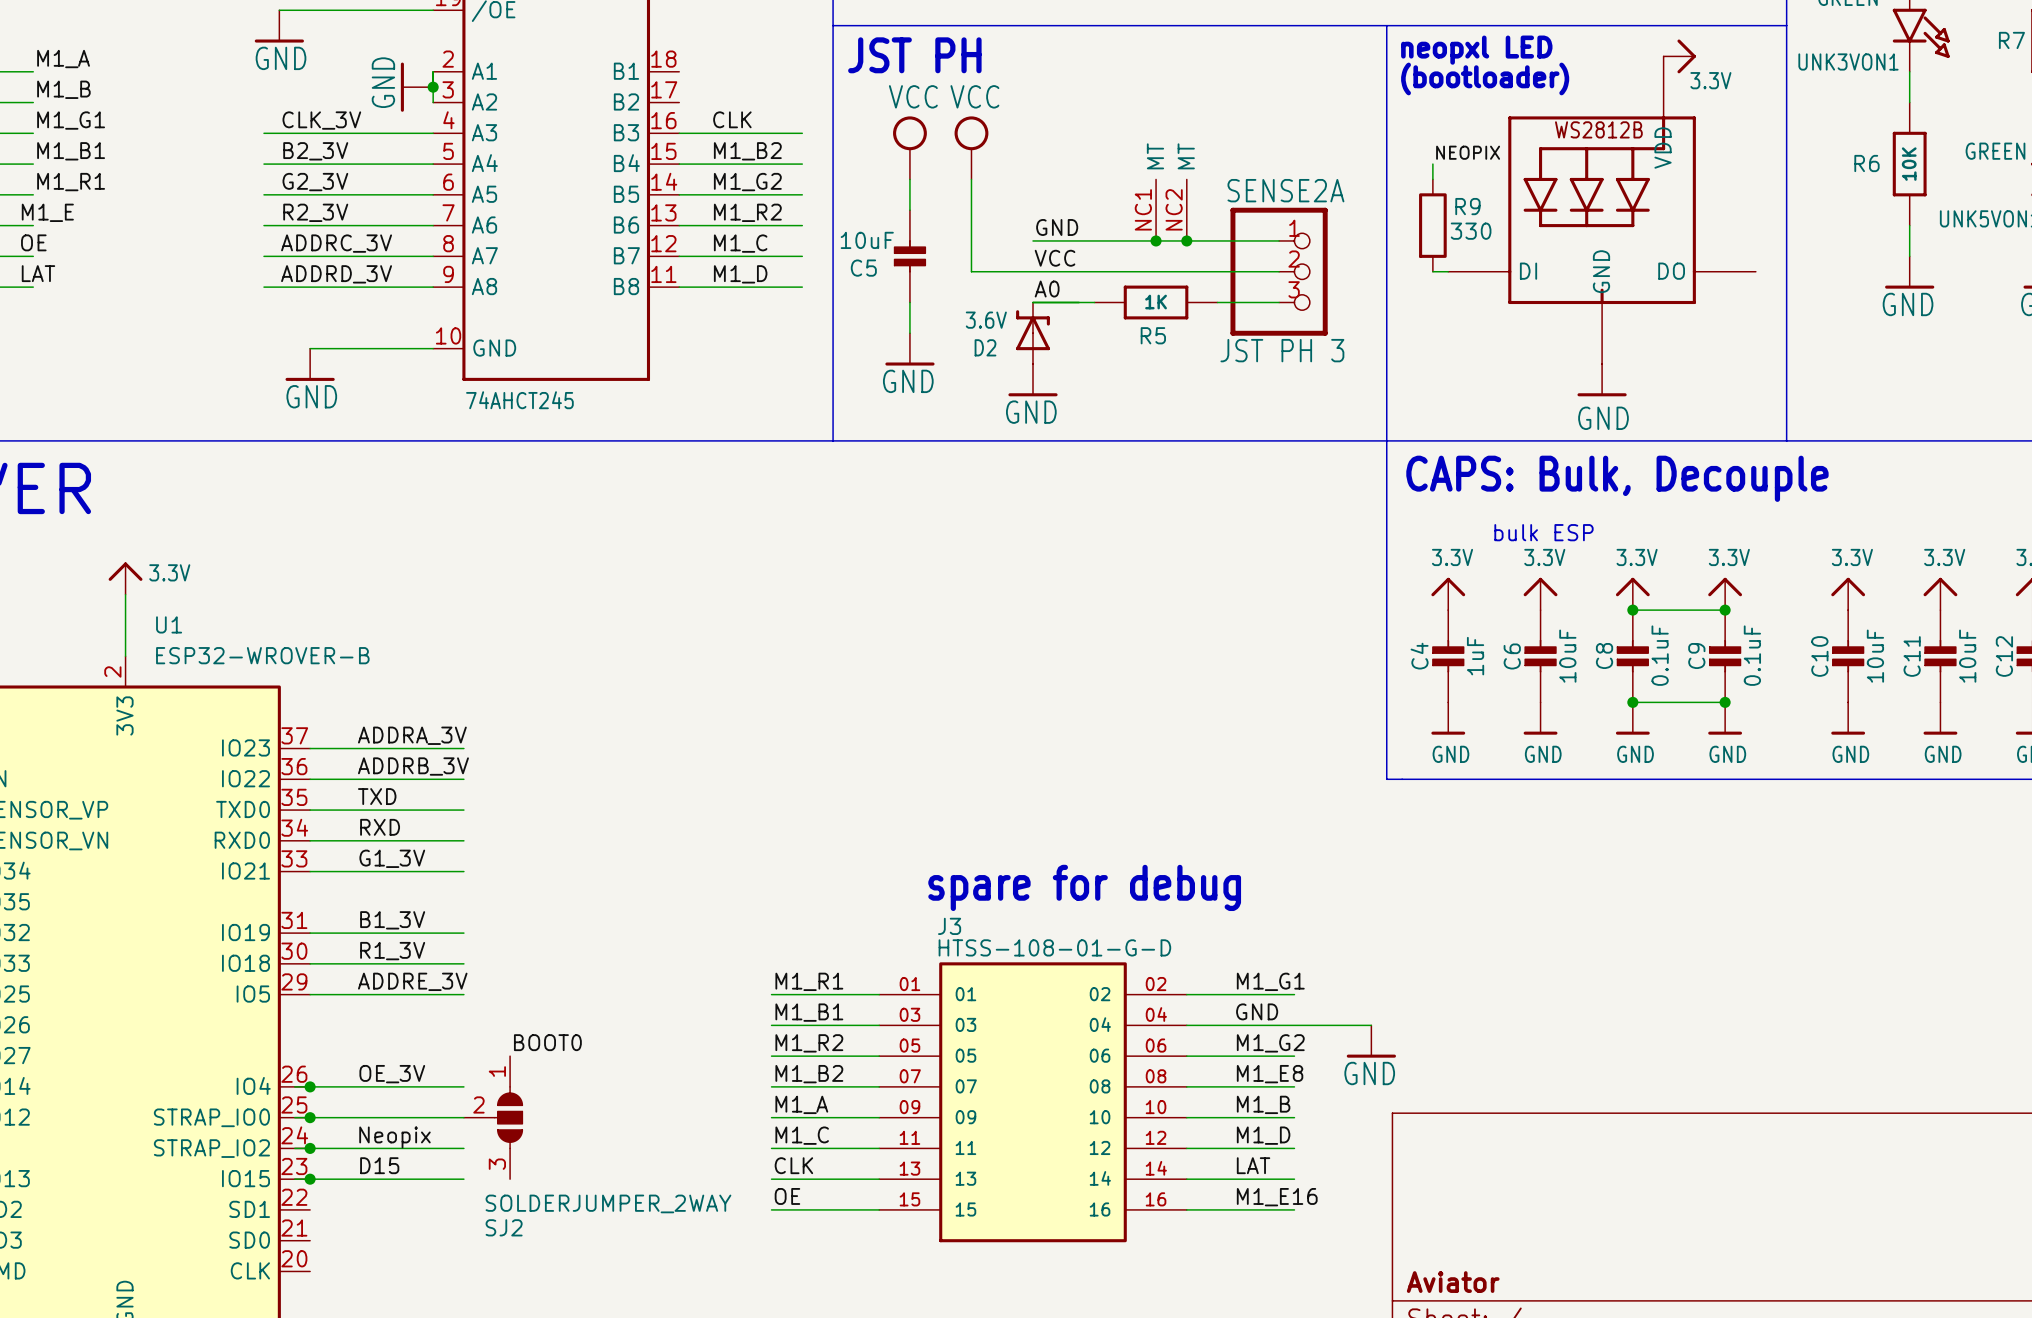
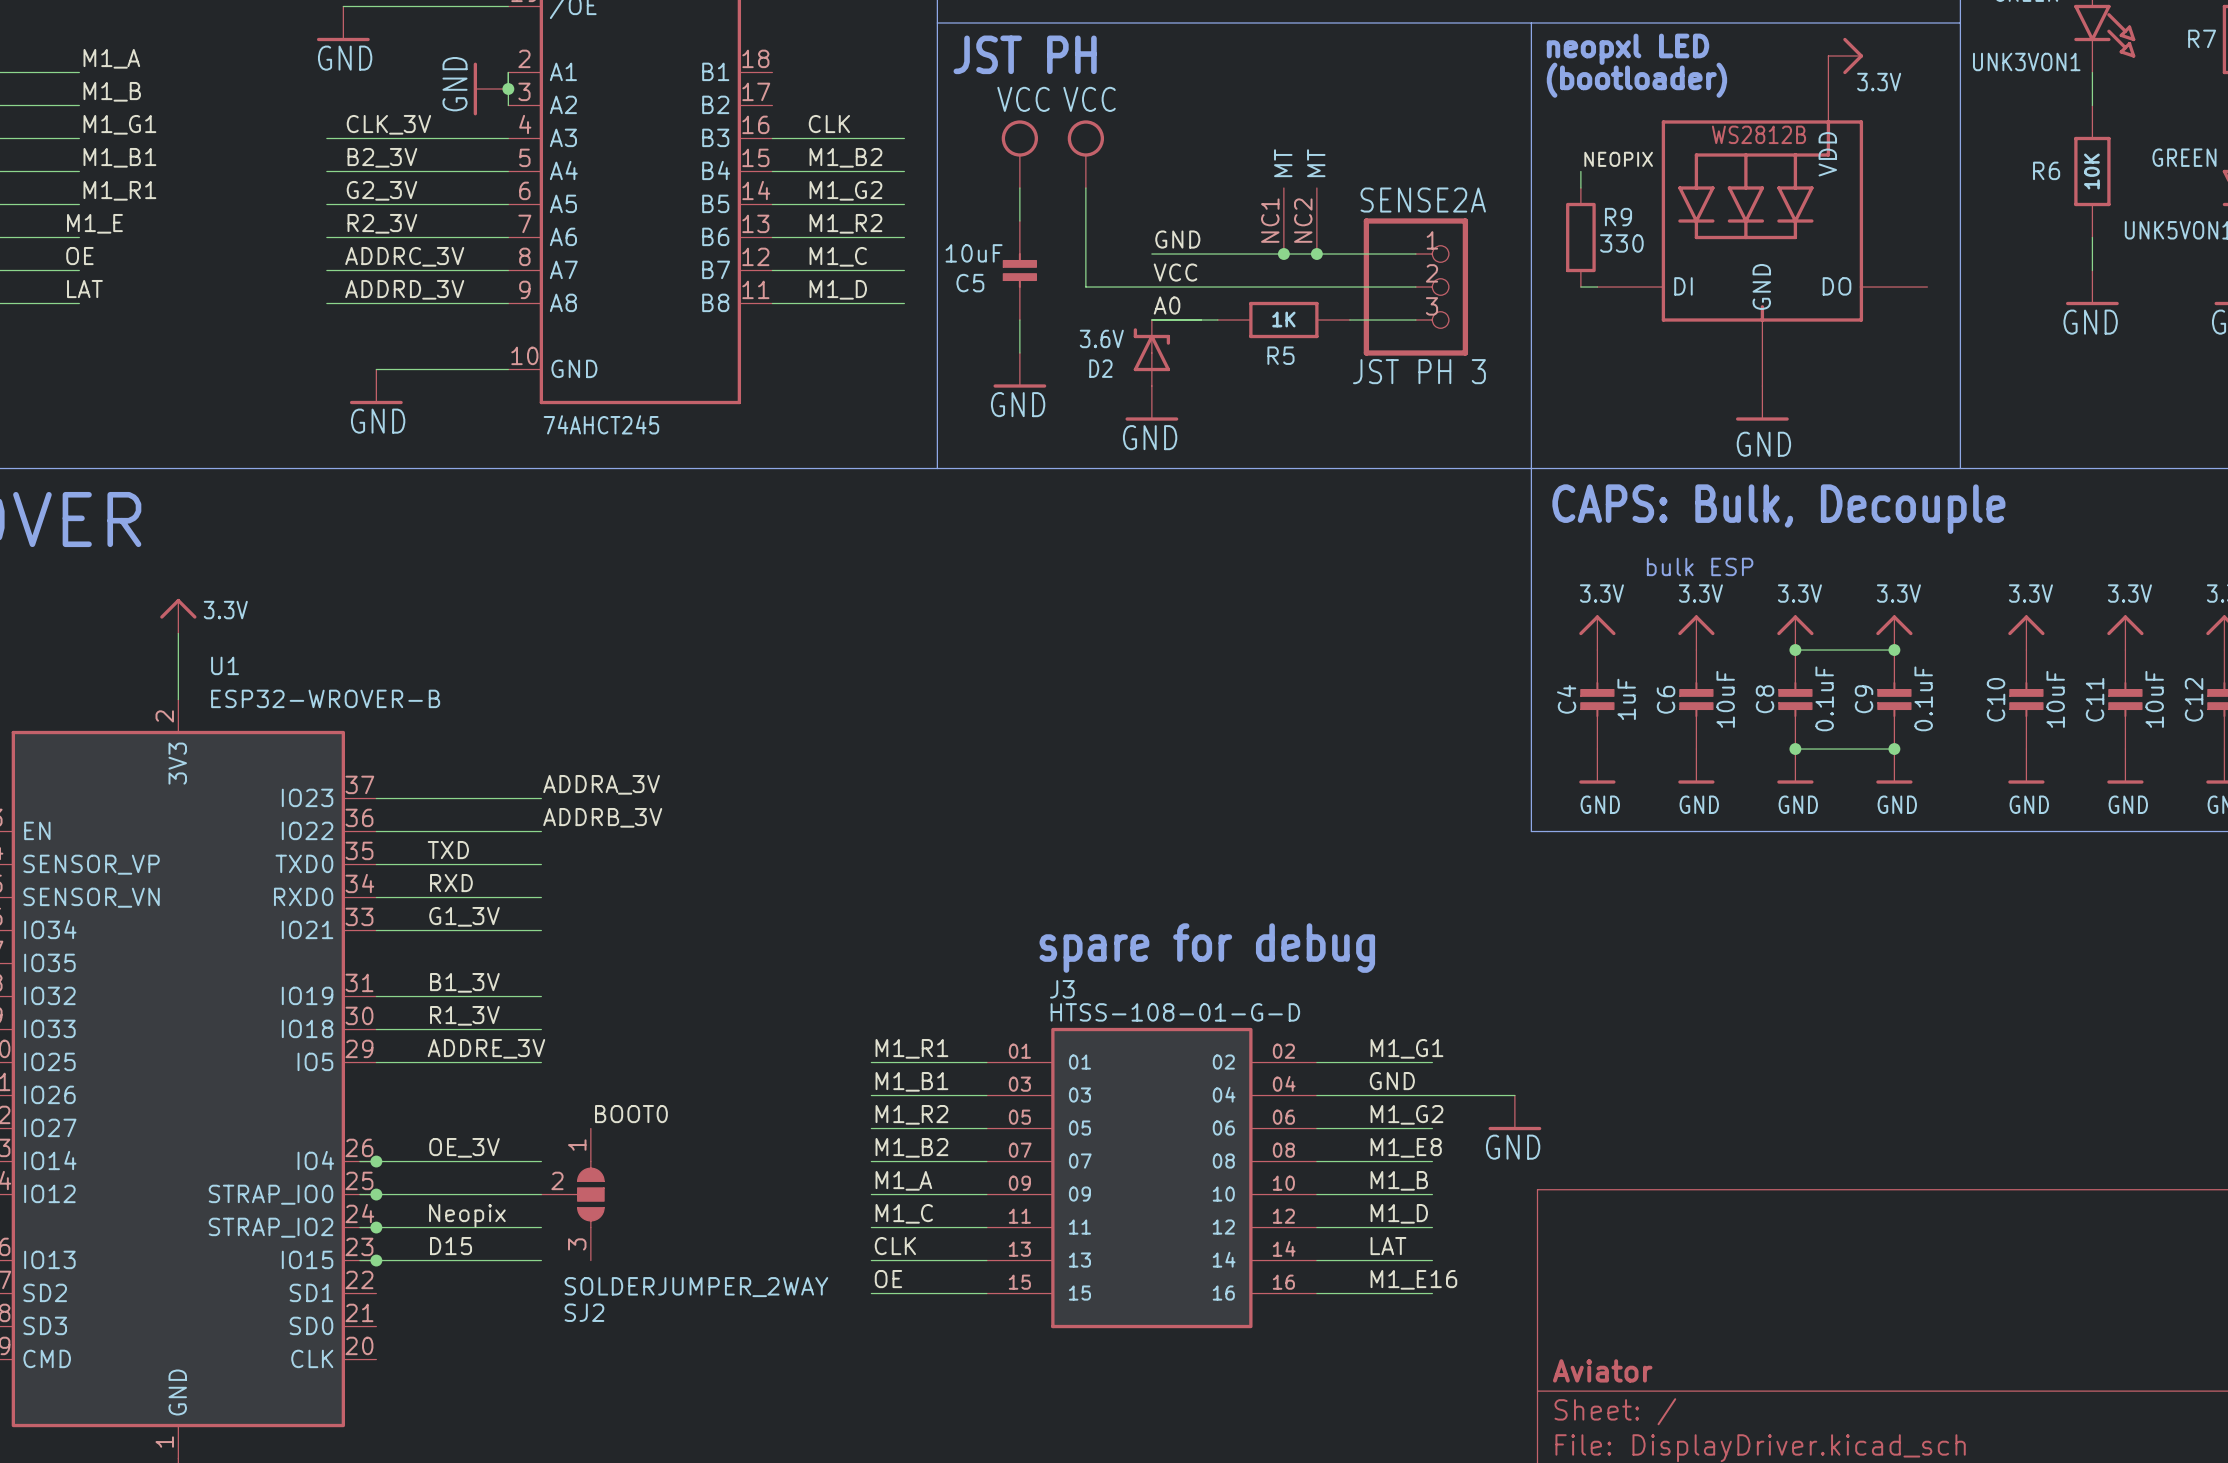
label position: ADDRA_3V (412, 735) -> ADDRA_3V (601, 784)
label position: ADDRB_3V (413, 766) -> ADDRB_3V (602, 817)

